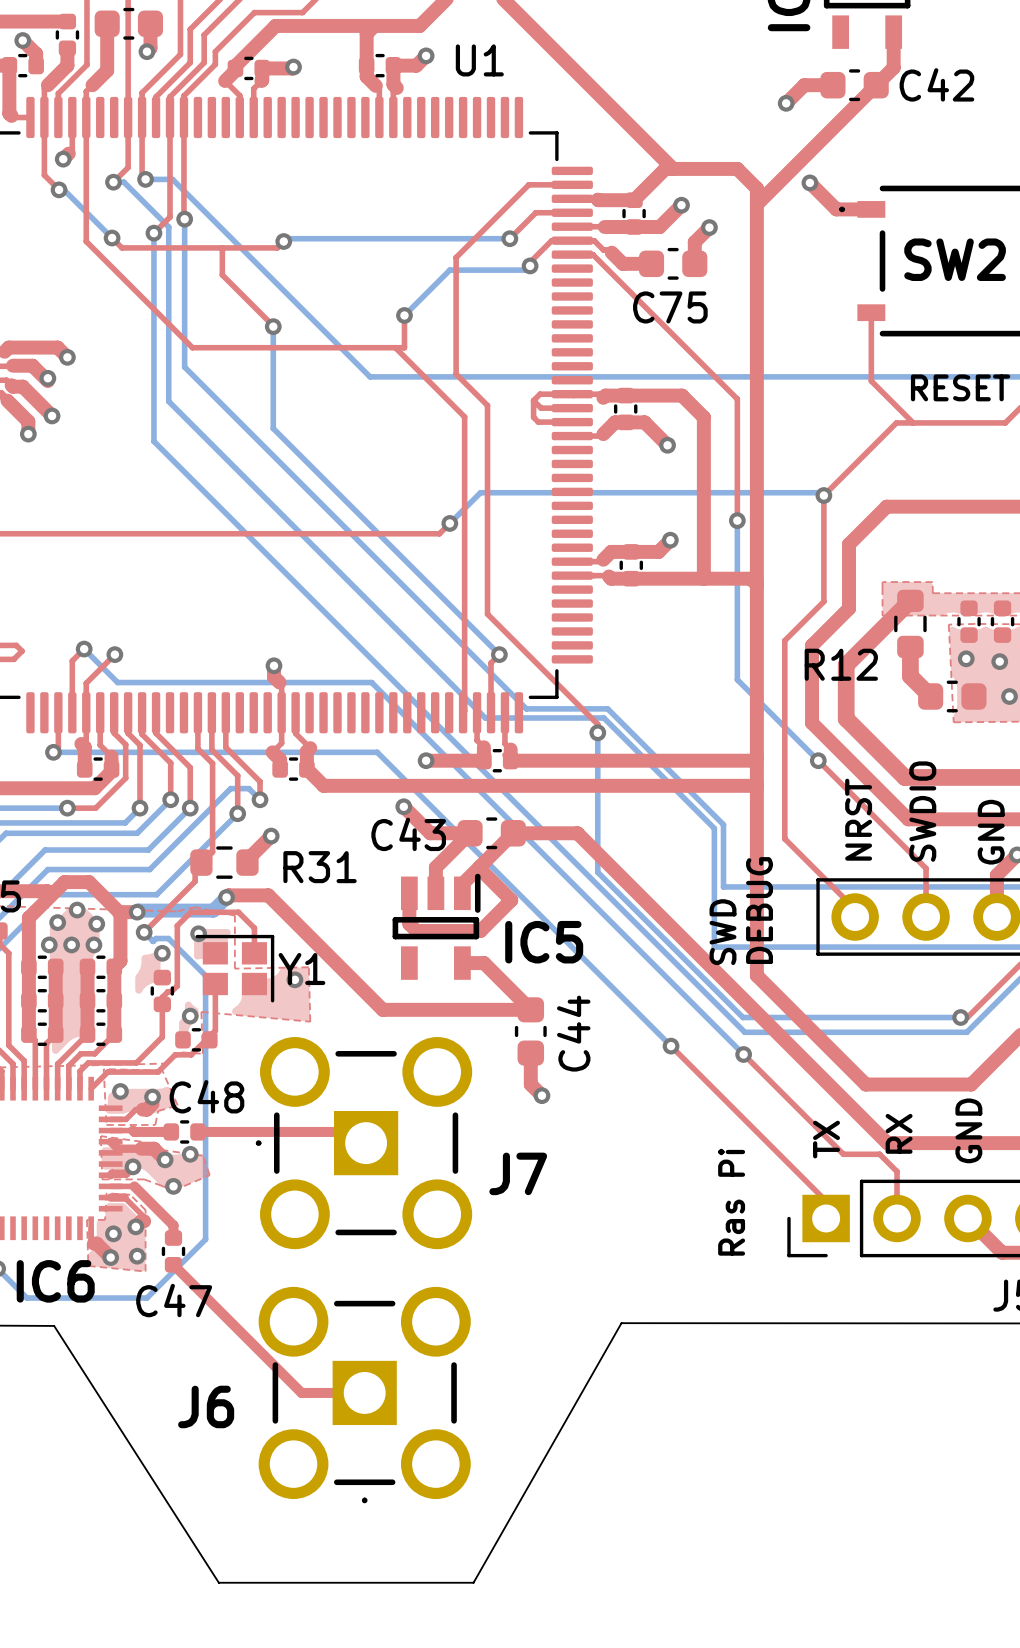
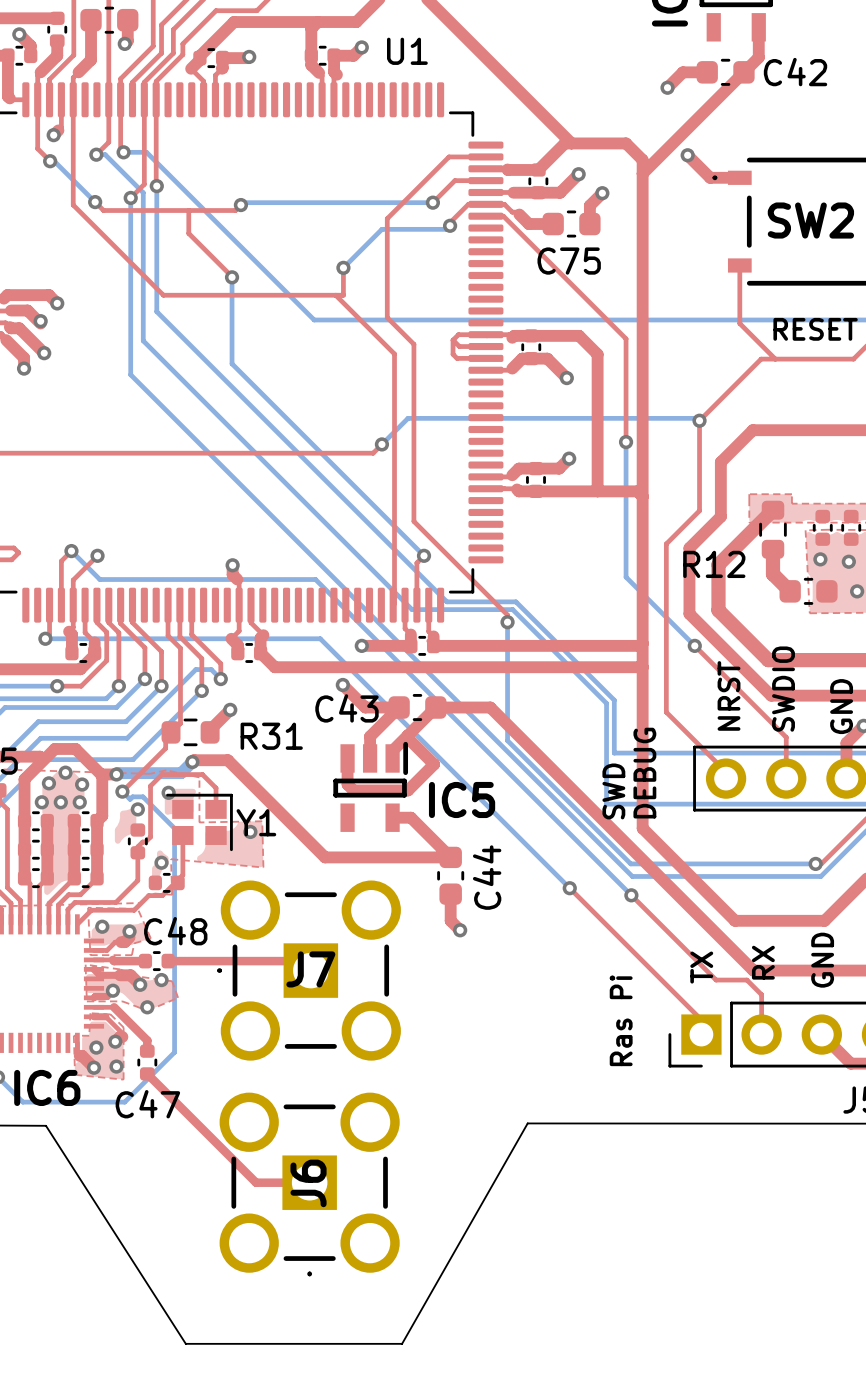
J7 name position: J7 (518, 1173) -> J7 (310, 969)
J6 name rotation: 0° (206, 1406) -> 90° counterclockwise (308, 1183)
J6 name position: J6 (206, 1406) -> J6 (308, 1183)

